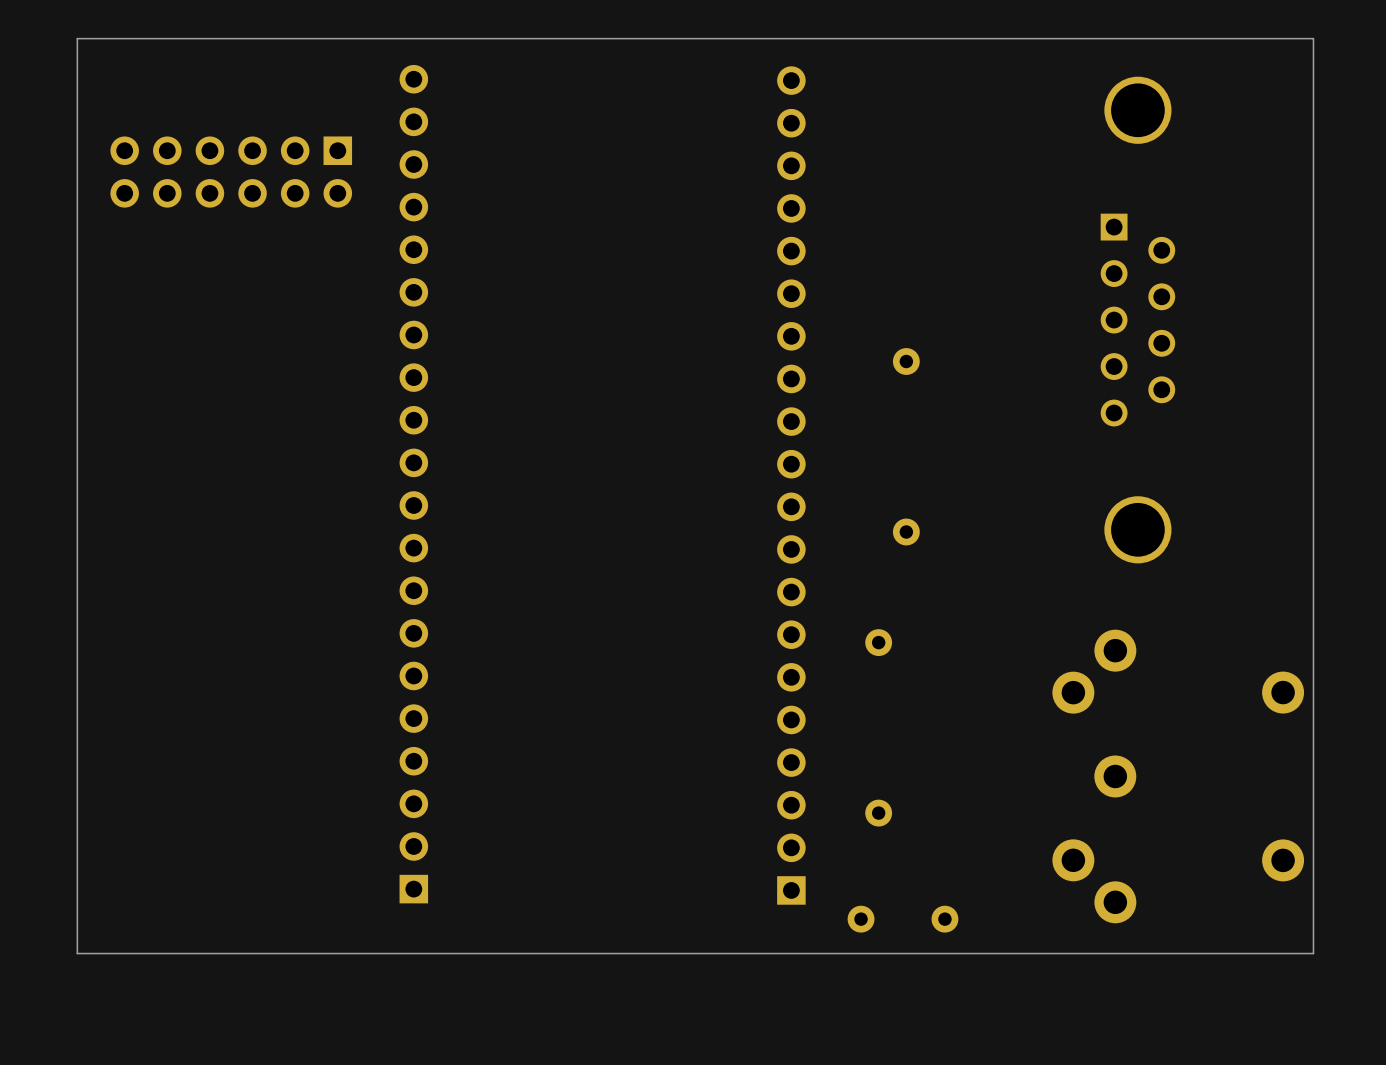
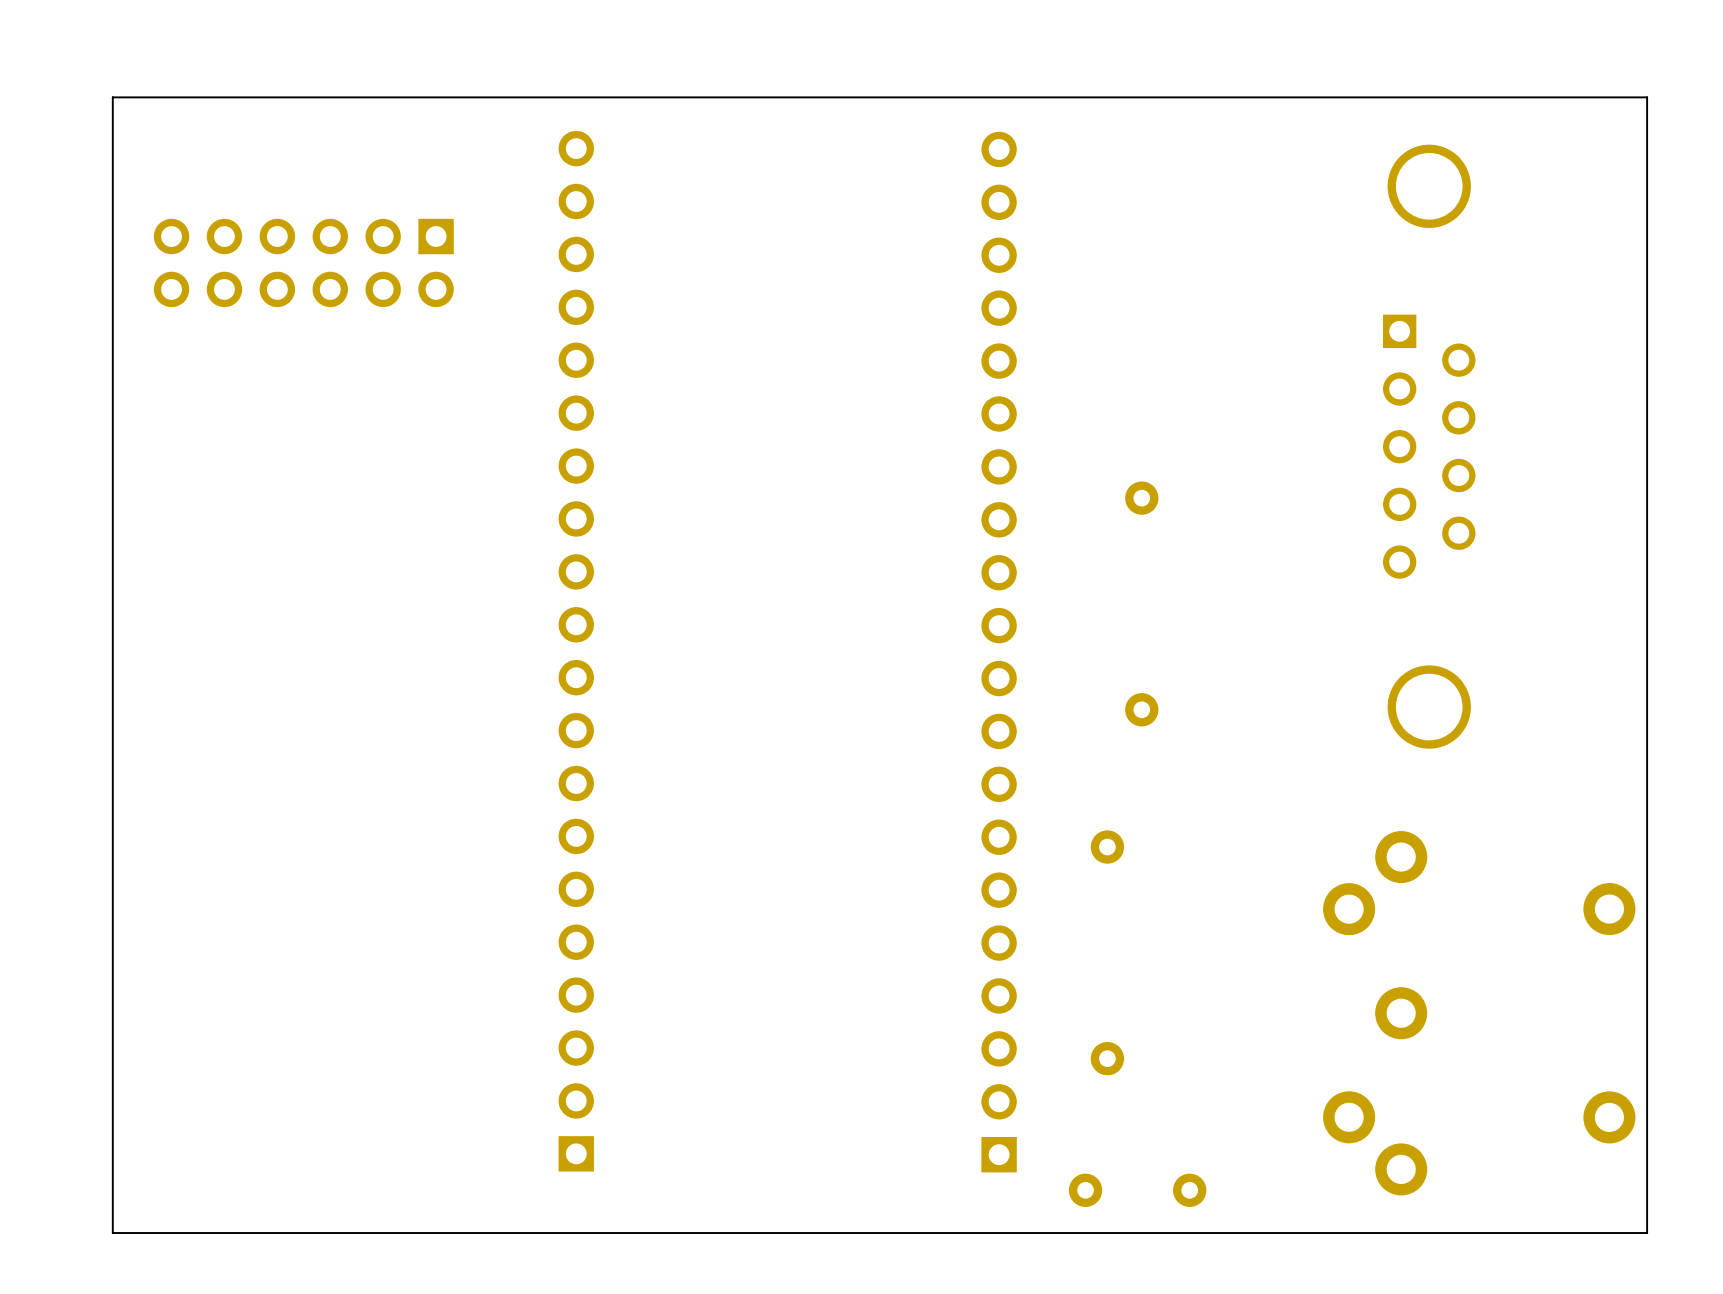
part position: (413, 484) -> (576, 651)

